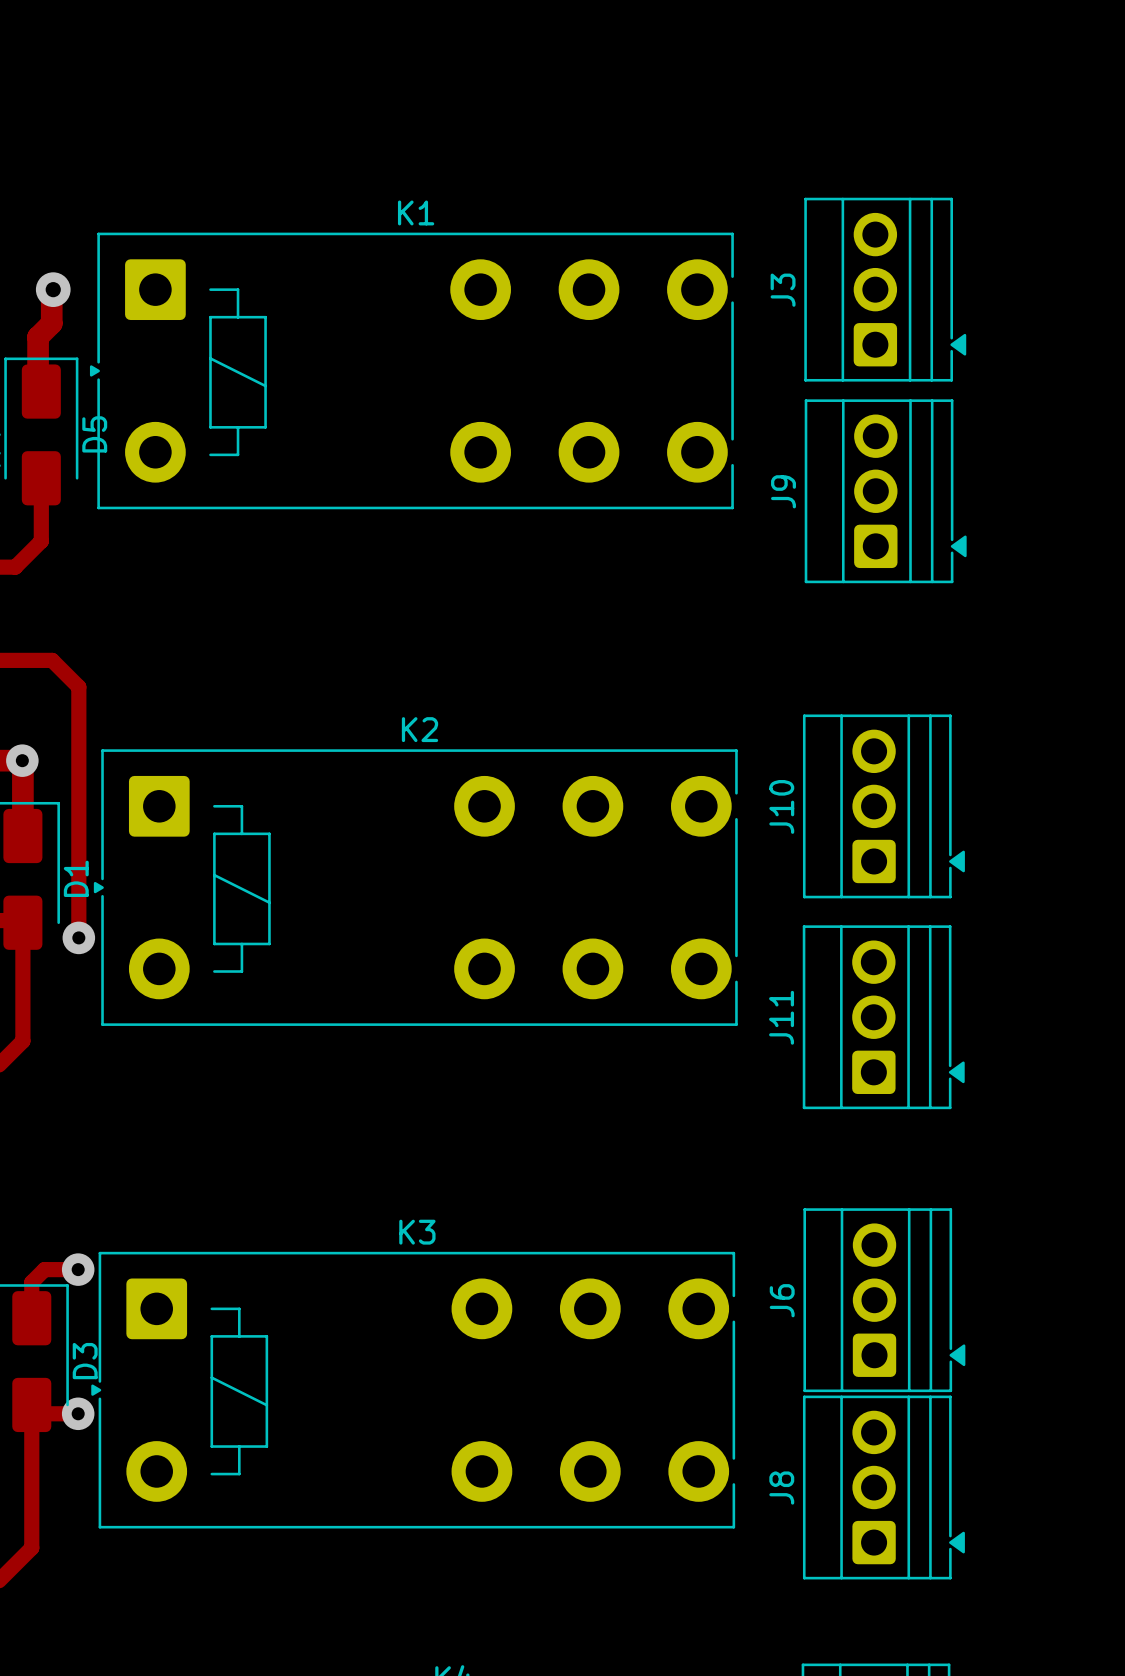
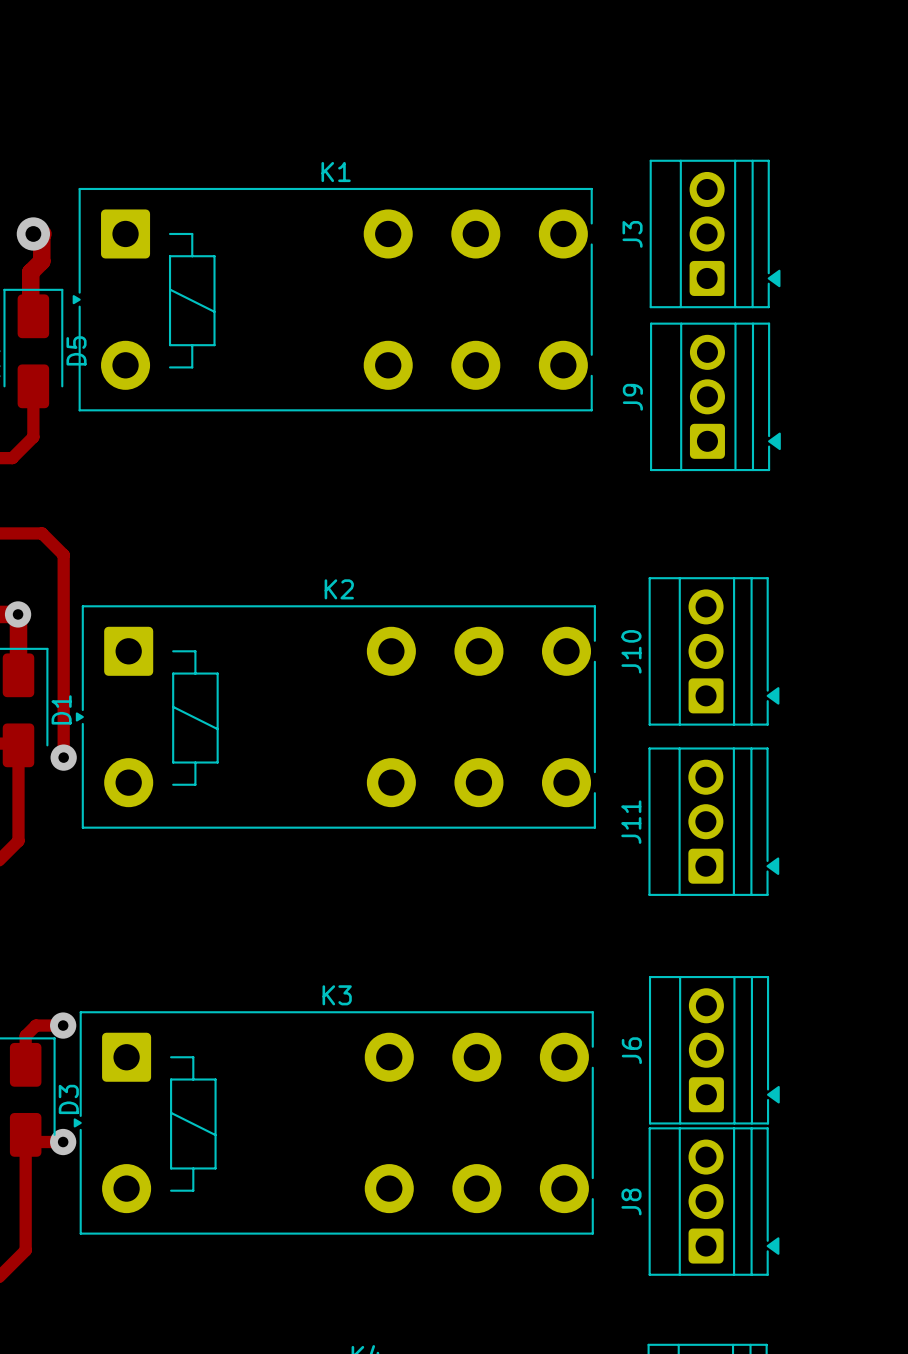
via size: [35, 272, 71, 308] -> [16, 217, 51, 251]

